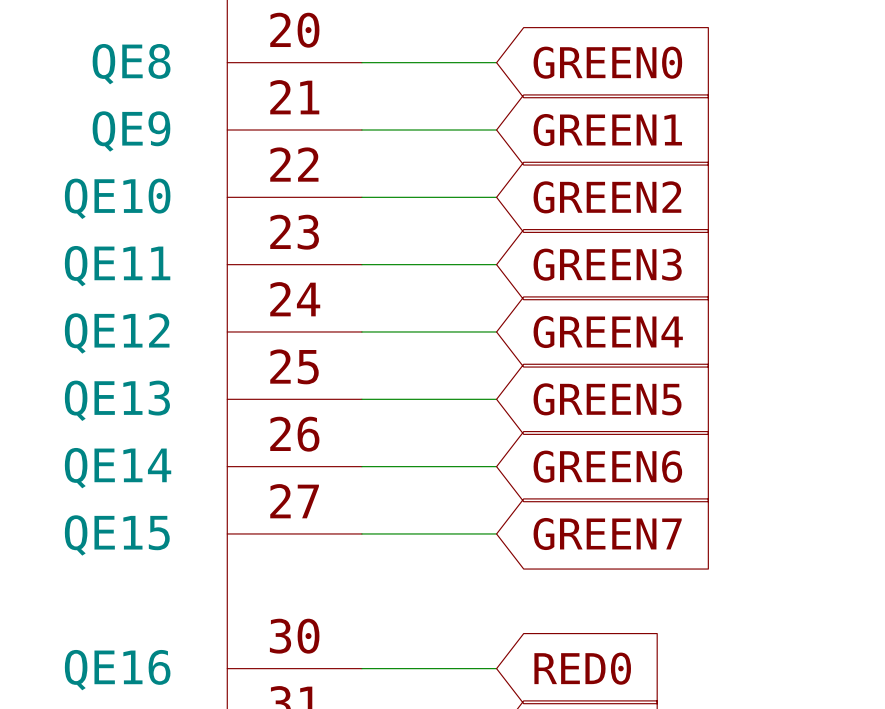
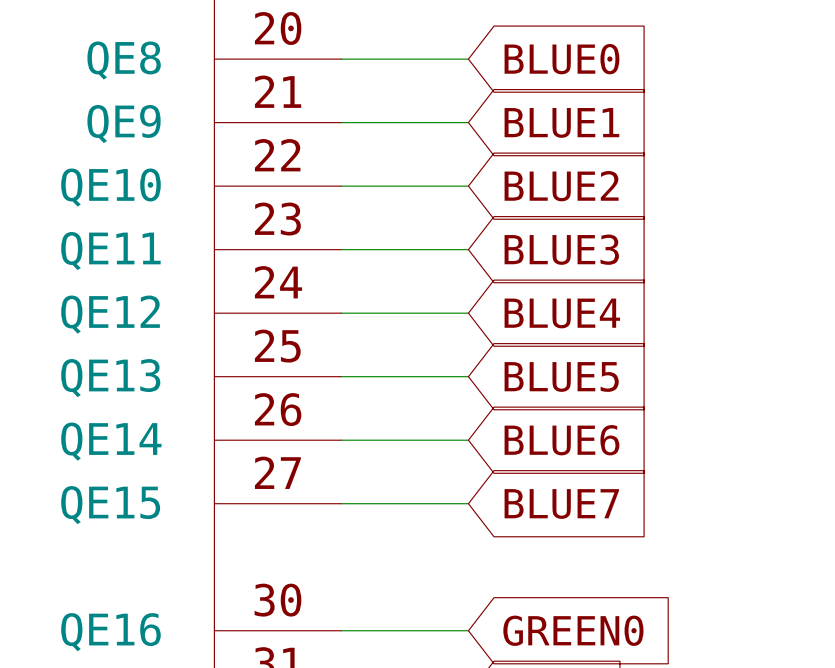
global label: GREEN0 (607, 62) -> BLUE0 (561, 59)
global label: GREEN1 (607, 130) -> BLUE1 (561, 122)
global label: GREEN2 (607, 197) -> BLUE2 (561, 186)
global label: GREEN3 (607, 264) -> BLUE3 (561, 249)
global label: GREEN4 (608, 332) -> BLUE4 (562, 313)
global label: GREEN5 (607, 399) -> BLUE5 (561, 376)
global label: GREEN6 (607, 466) -> BLUE6 (561, 440)
global label: GREEN7 (607, 534) -> BLUE7 (561, 504)
global label: RED0 (582, 668) -> GREEN0 (573, 630)

